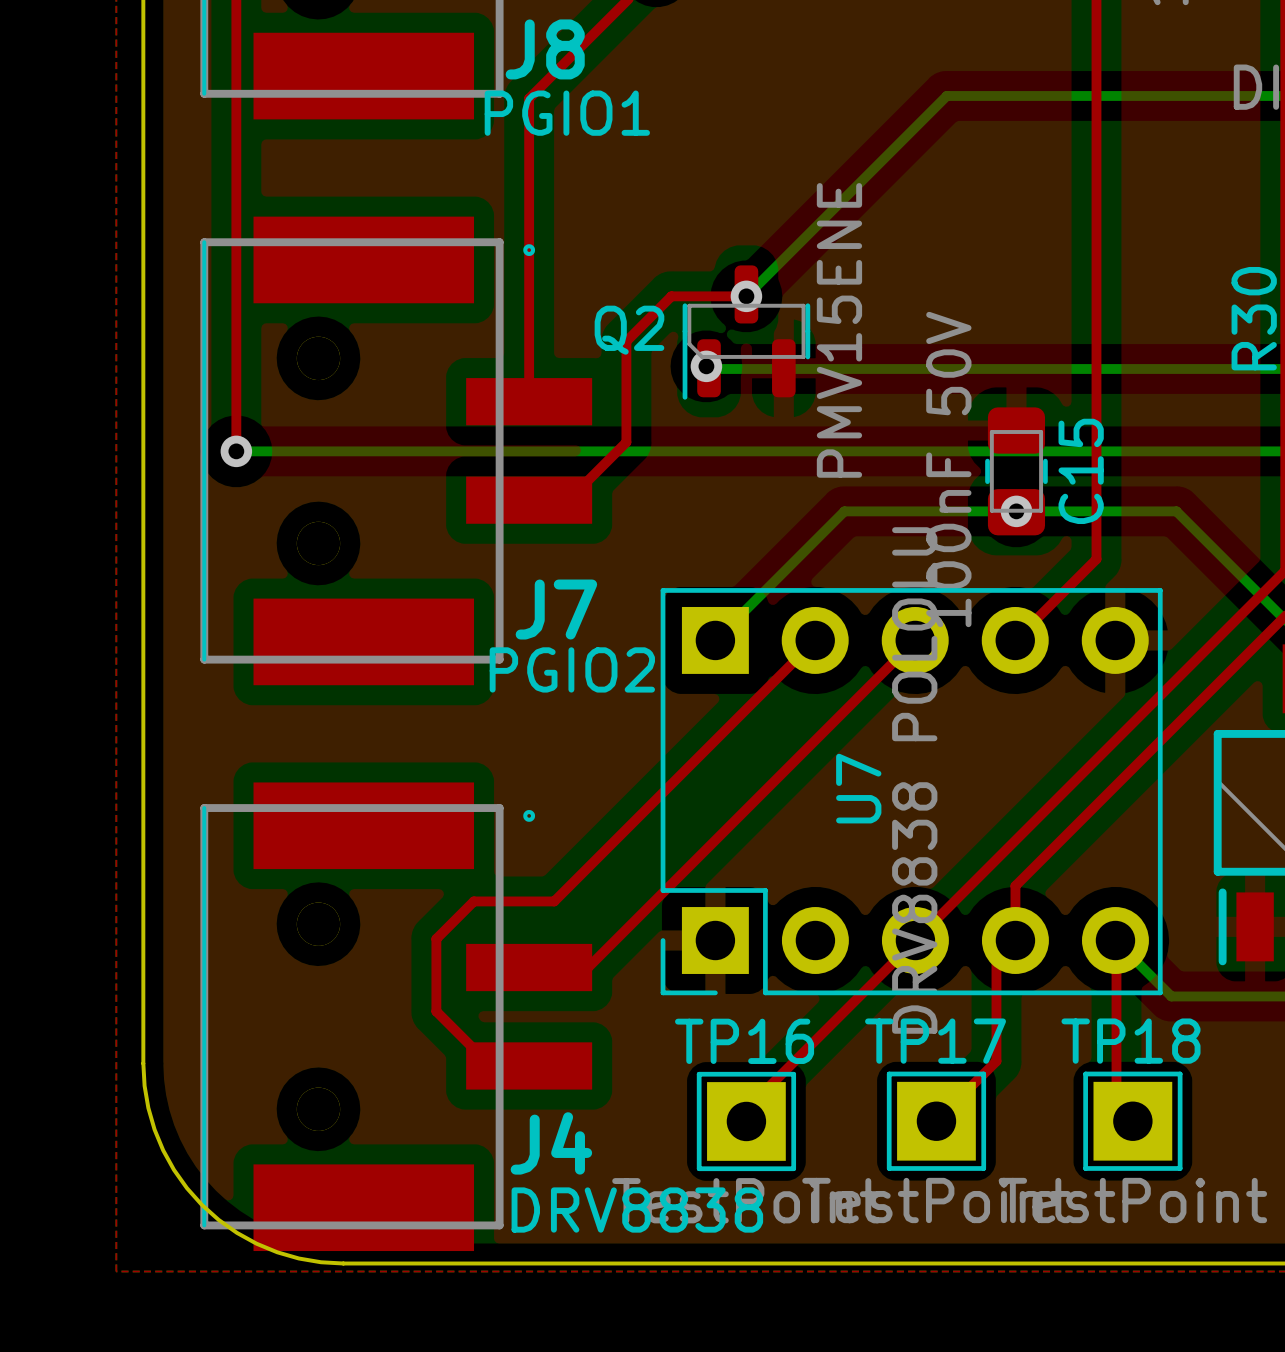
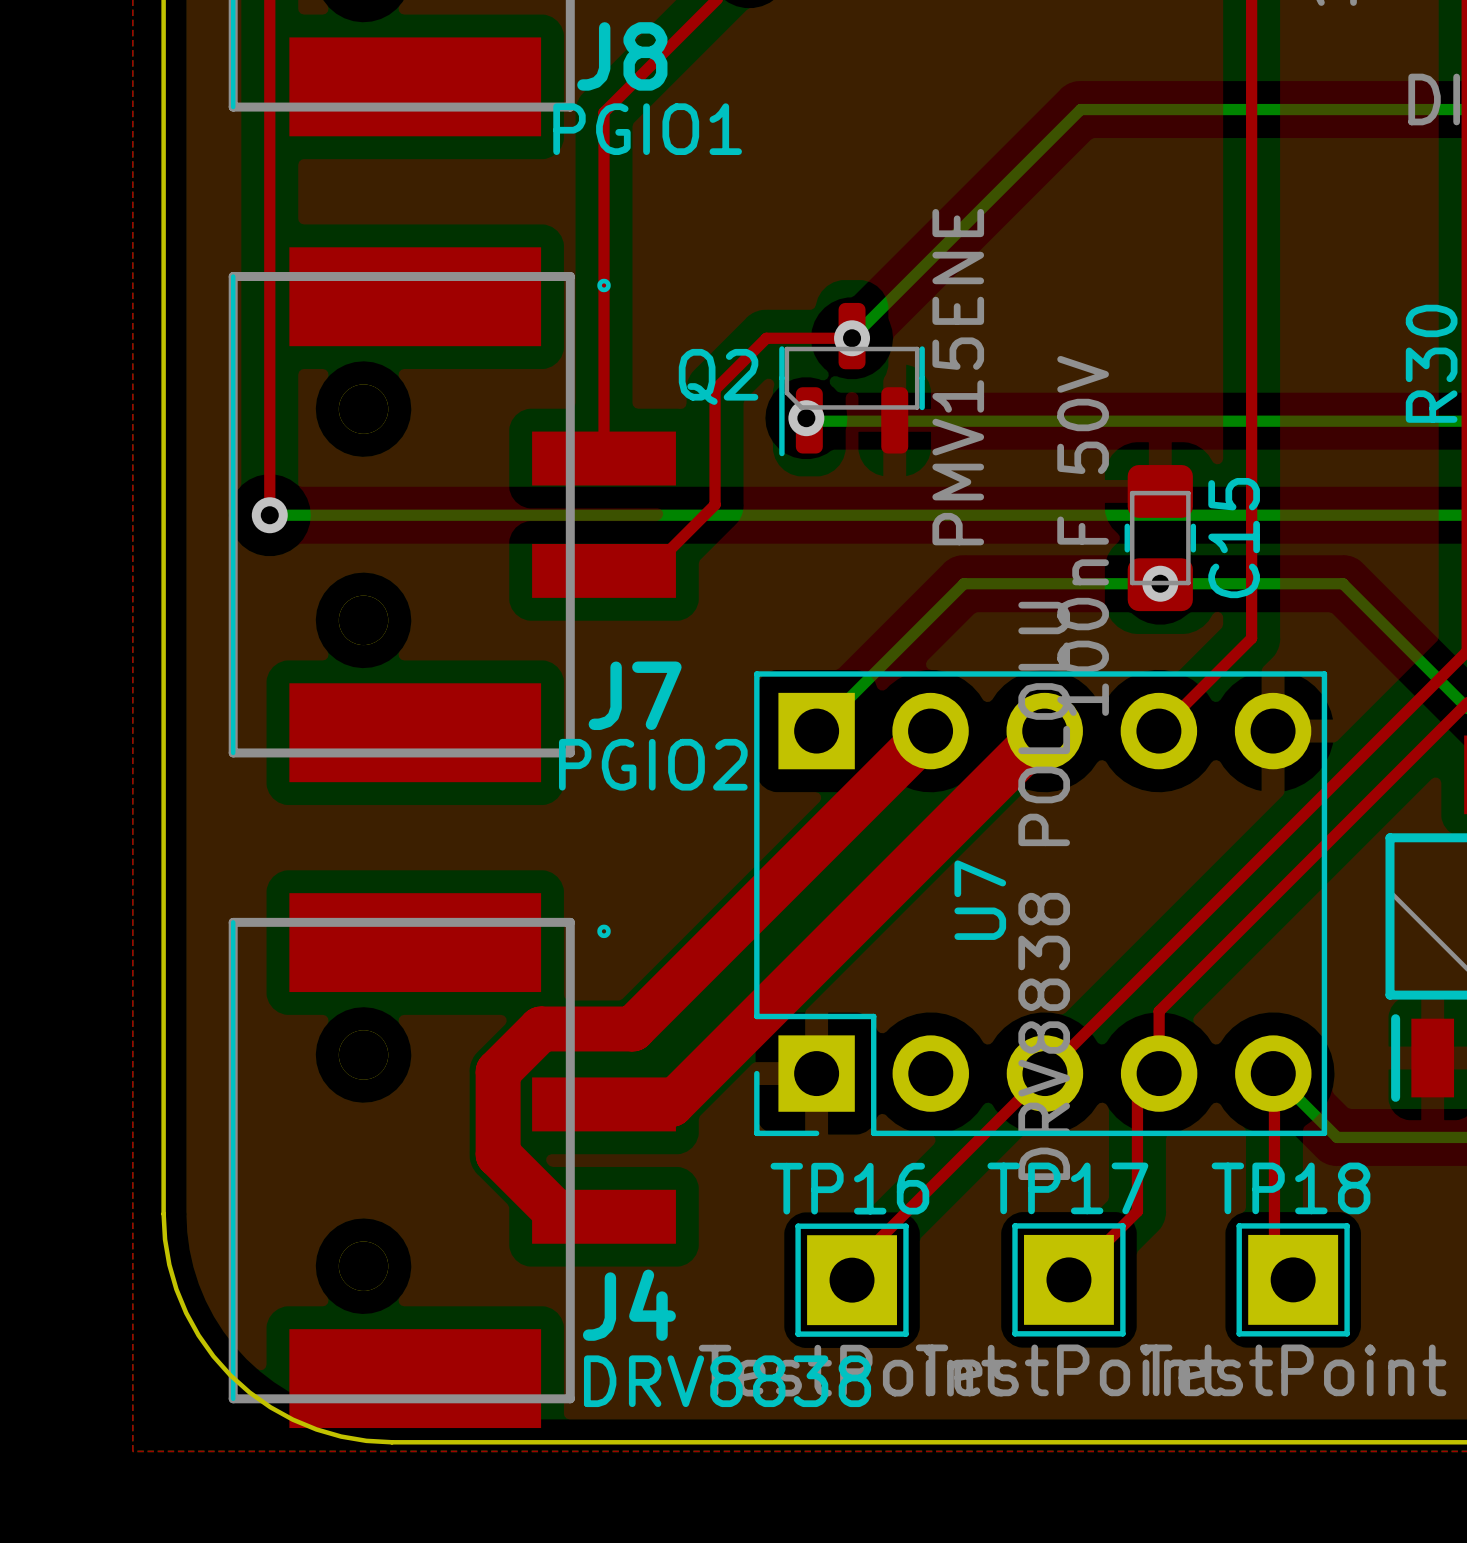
top track width: thin (815, 640) (554, 901) (473, 901) (436, 938) (436, 1011) (490, 1065) (529, 1065) -> thick (930, 731) (632, 1028) (540, 1028) (498, 1071) (498, 1154) (560, 1216) (604, 1216)
top track width: thin (915, 640) (588, 967) (529, 967) -> thick (1044, 731) (671, 1104) (604, 1104)

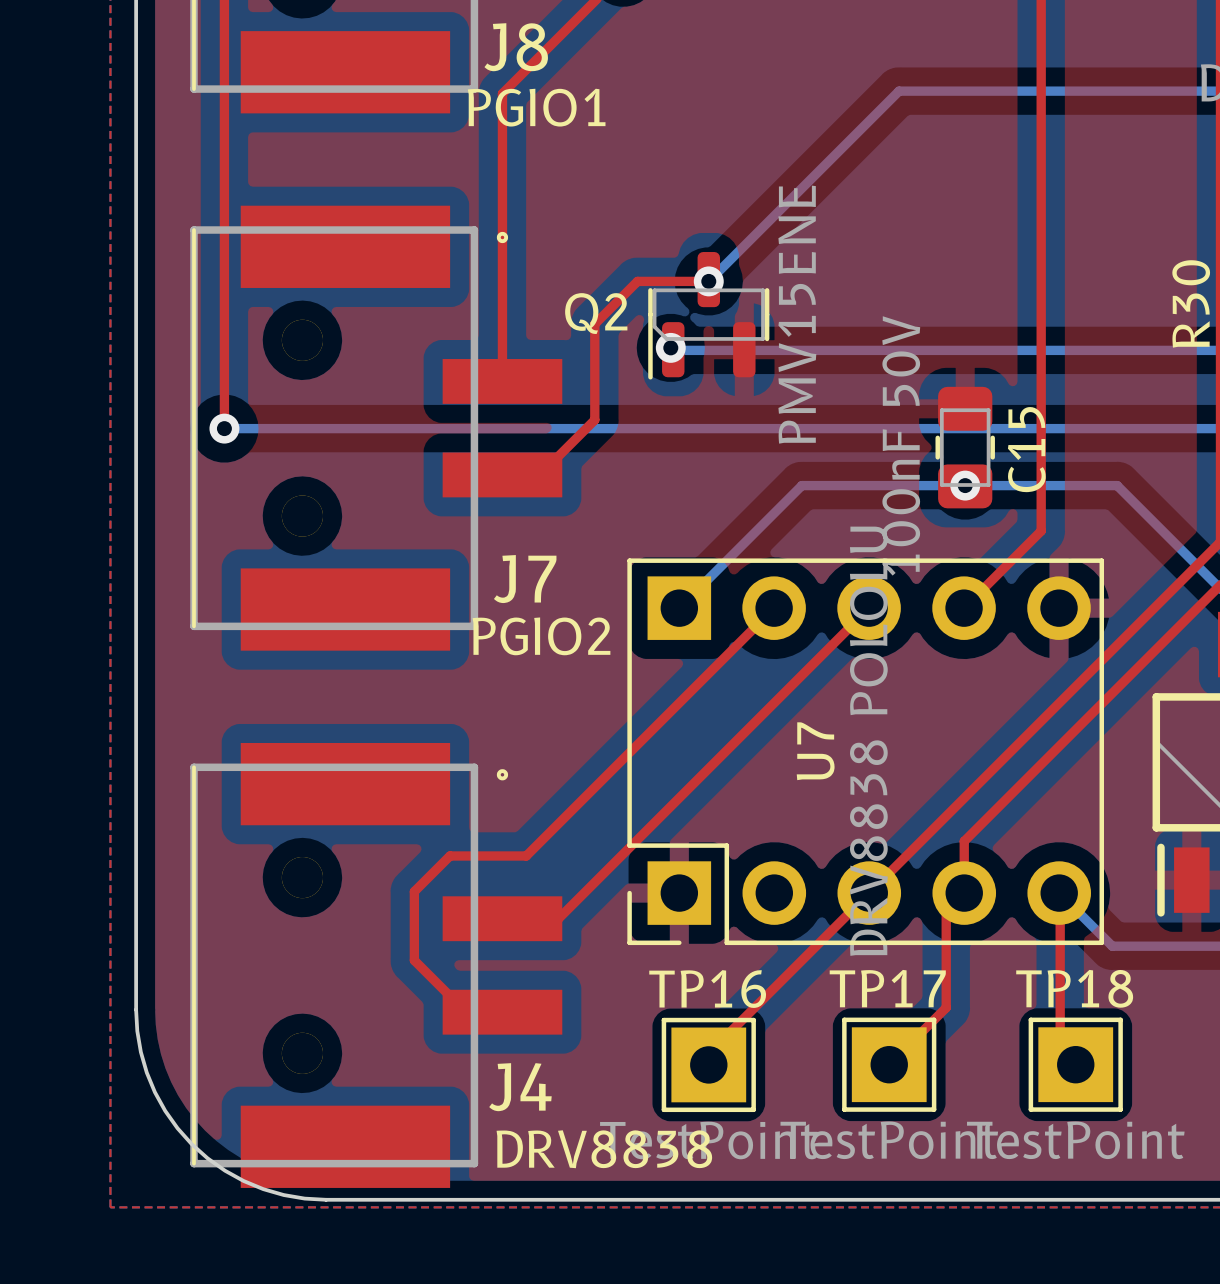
top track width: thick (930, 731) (632, 1028) (540, 1028) (498, 1071) (498, 1154) (560, 1216) (604, 1216) -> thin (774, 608) (526, 855) (449, 855) (414, 891) (414, 960) (466, 1012) (502, 1012)
top track width: thick (1044, 731) (671, 1104) (604, 1104) -> thin (869, 608) (558, 918) (502, 918)

